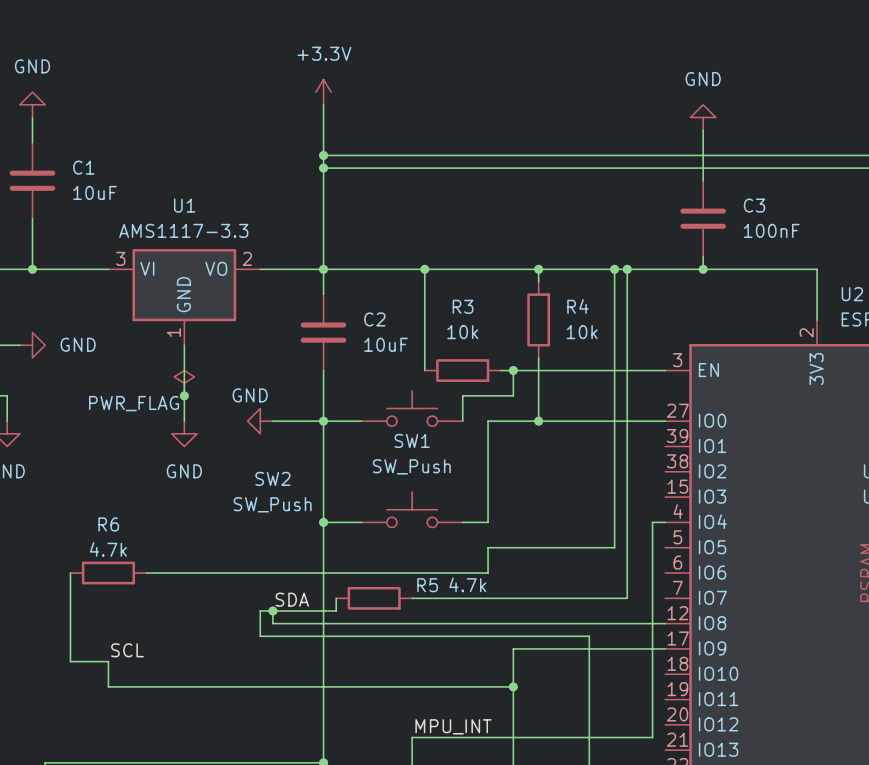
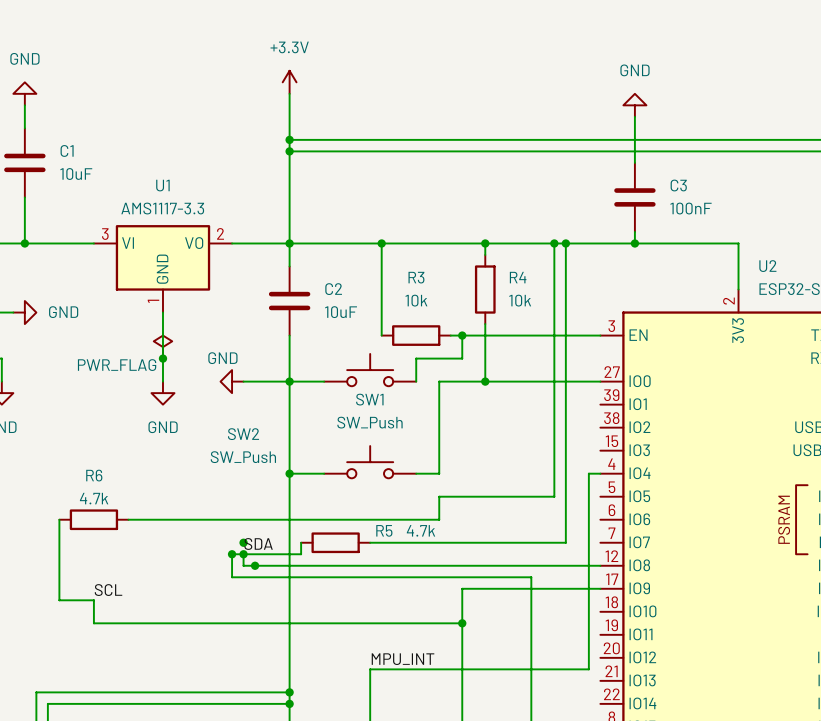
junction: none -> (243, 542)
junction: none -> (232, 554)
junction: none -> (255, 565)

